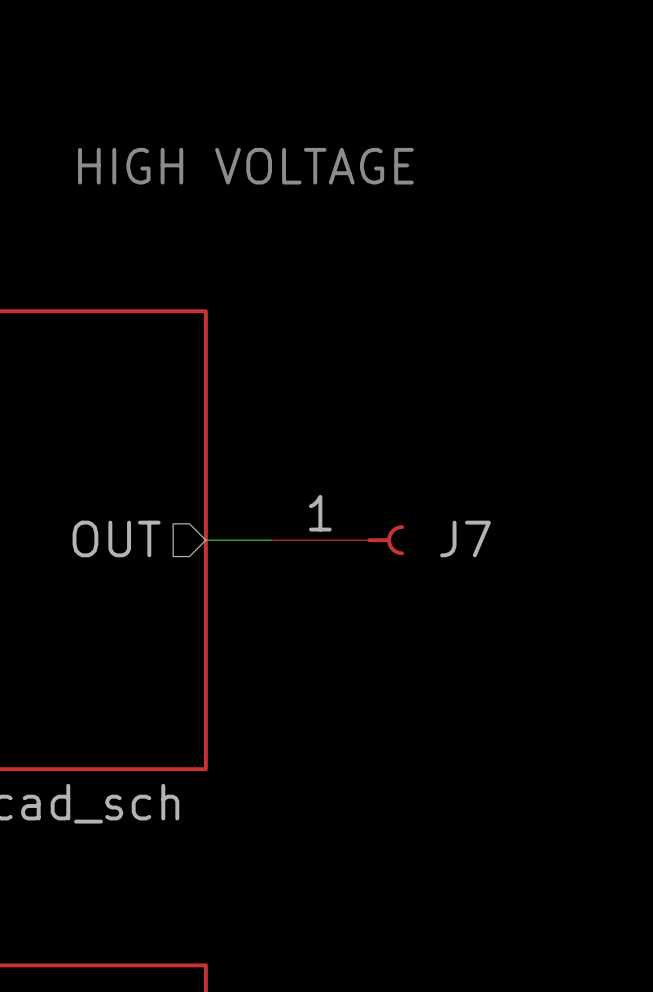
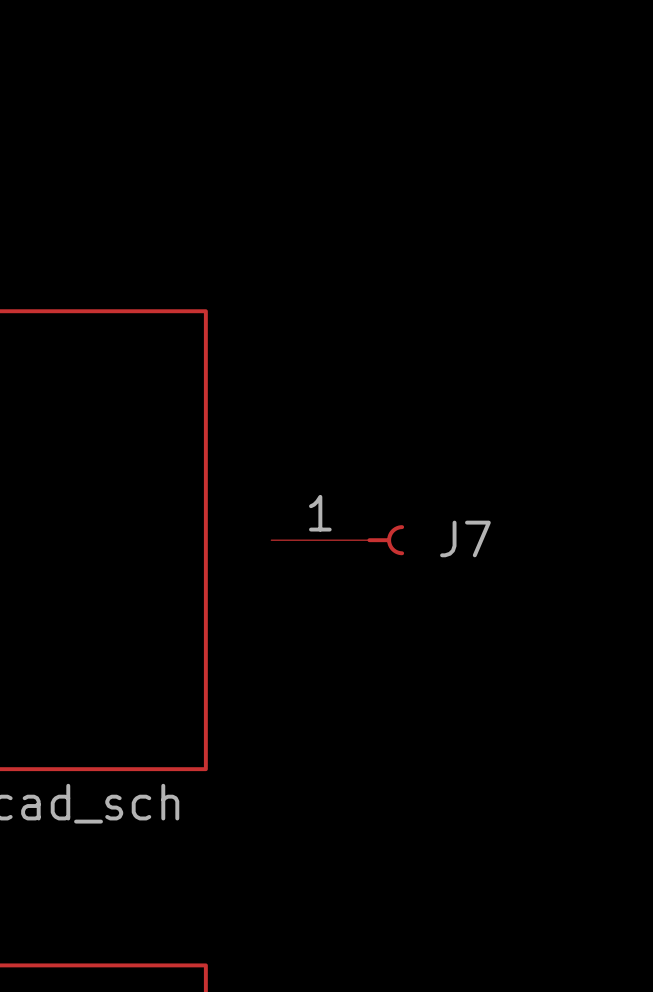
text: HIGH VOLTAGE (245, 166) -> none
sheet pin: OUT (116, 538) -> none
wire: (205, 540) (271, 540) -> none

